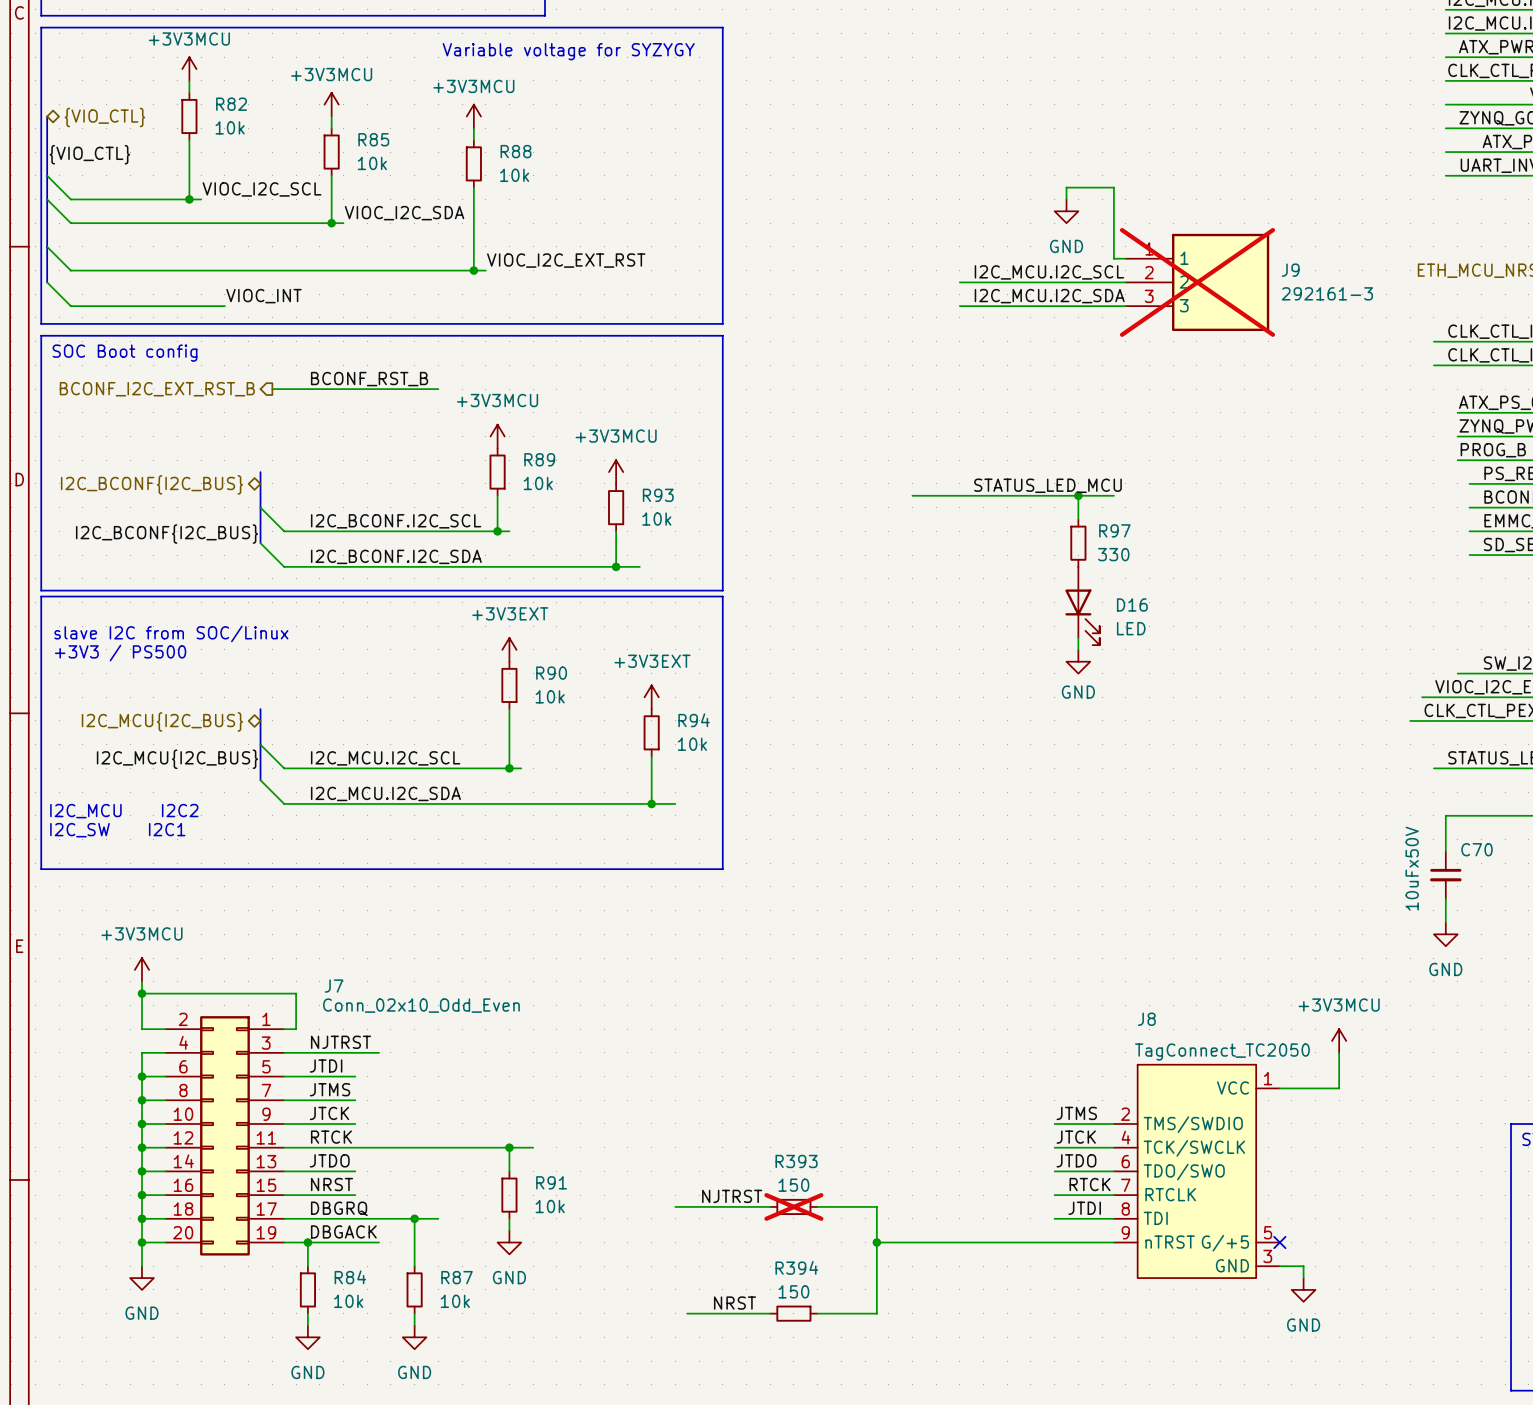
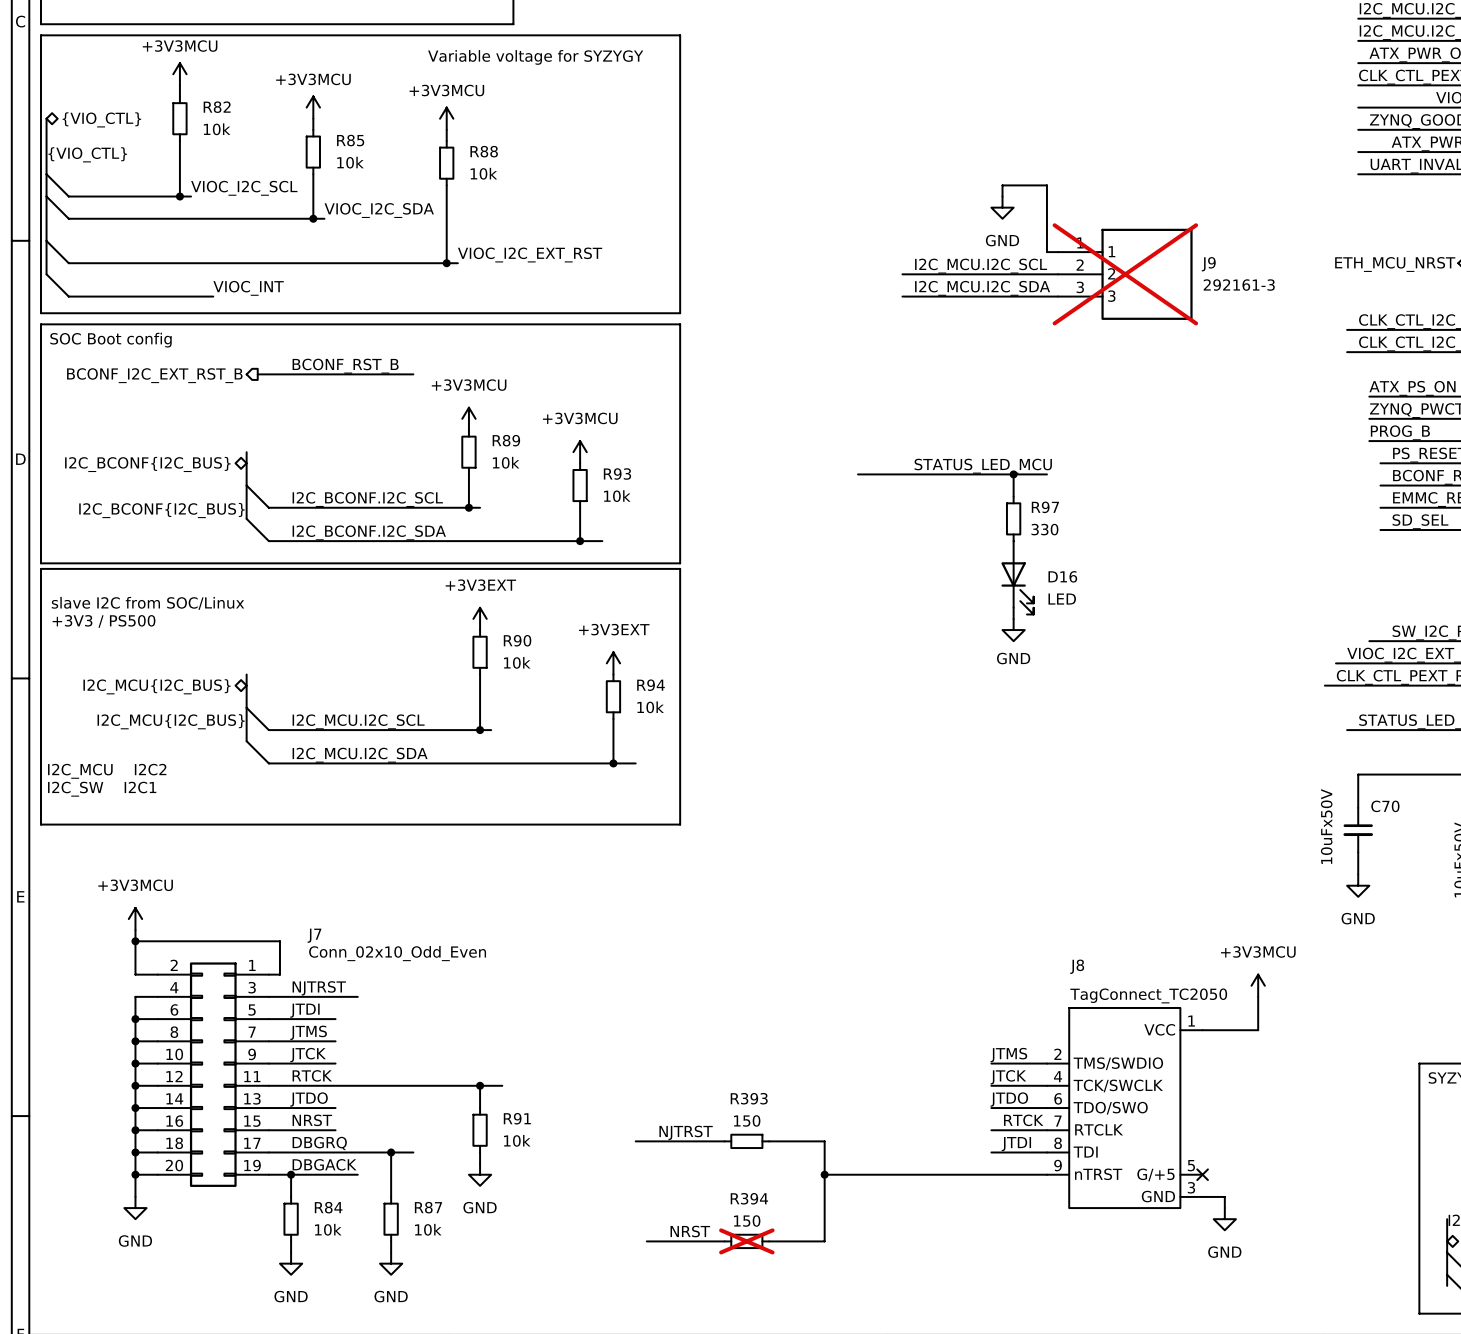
R393 do-not-place cross: (793, 1206) -> none
R394 do-not-place cross: none -> (746, 1241)

